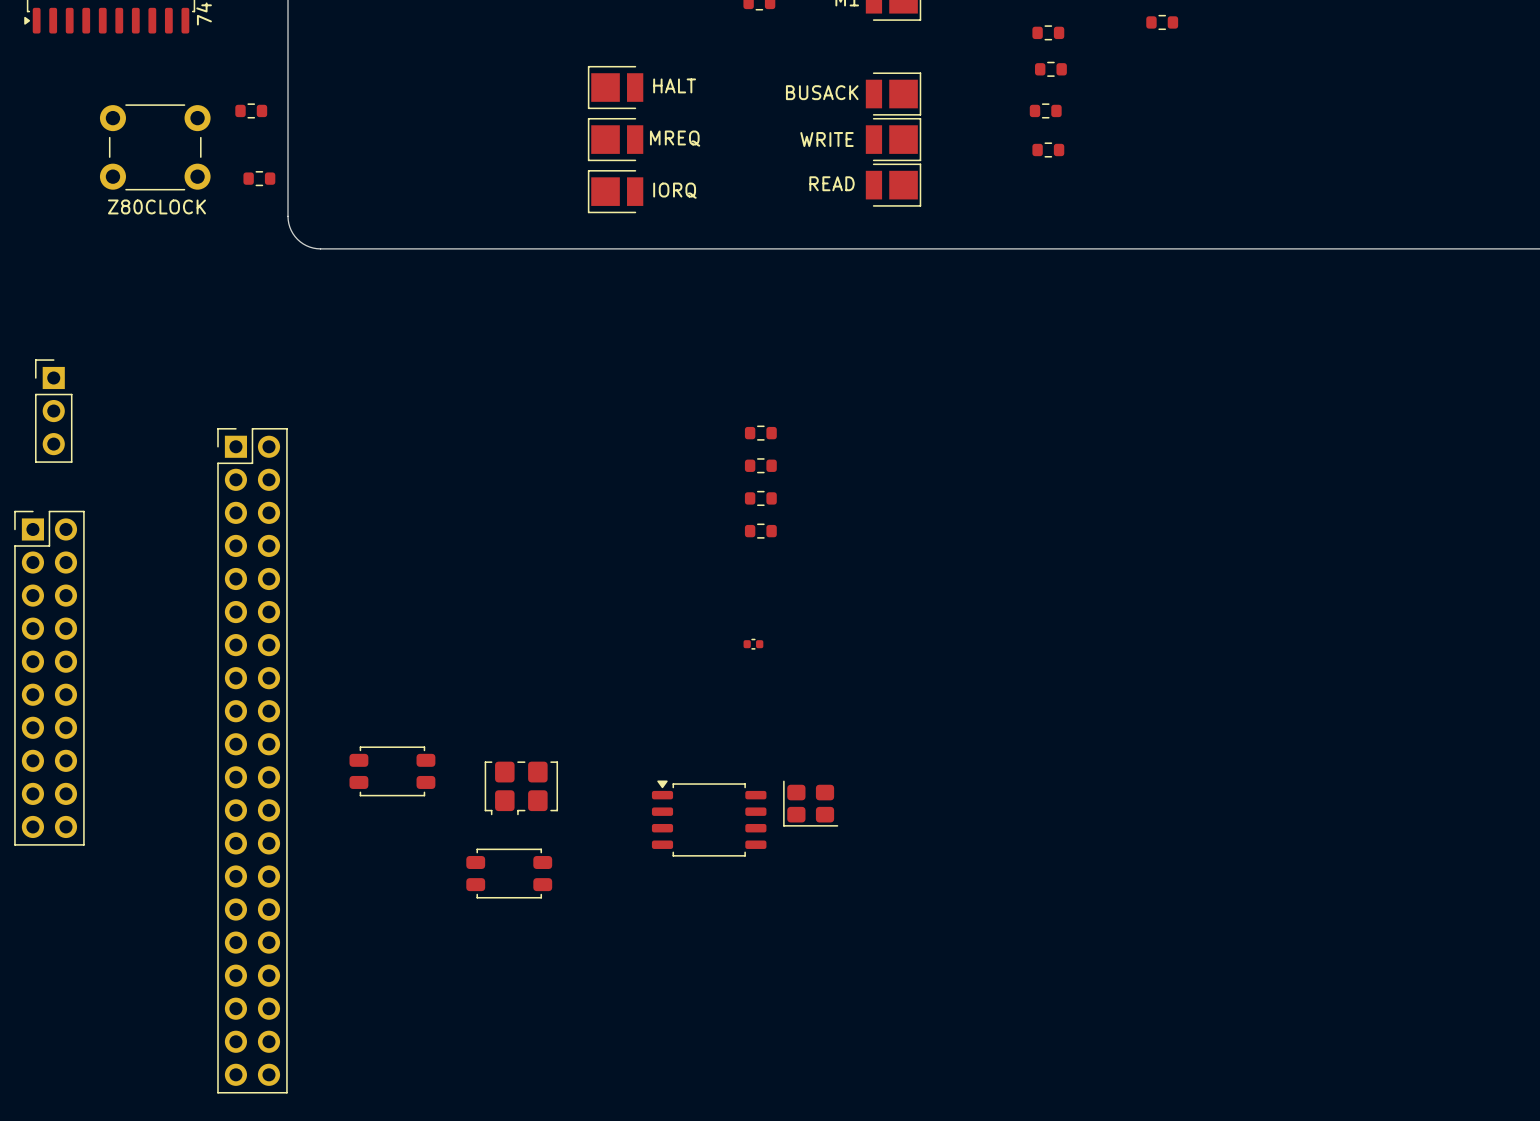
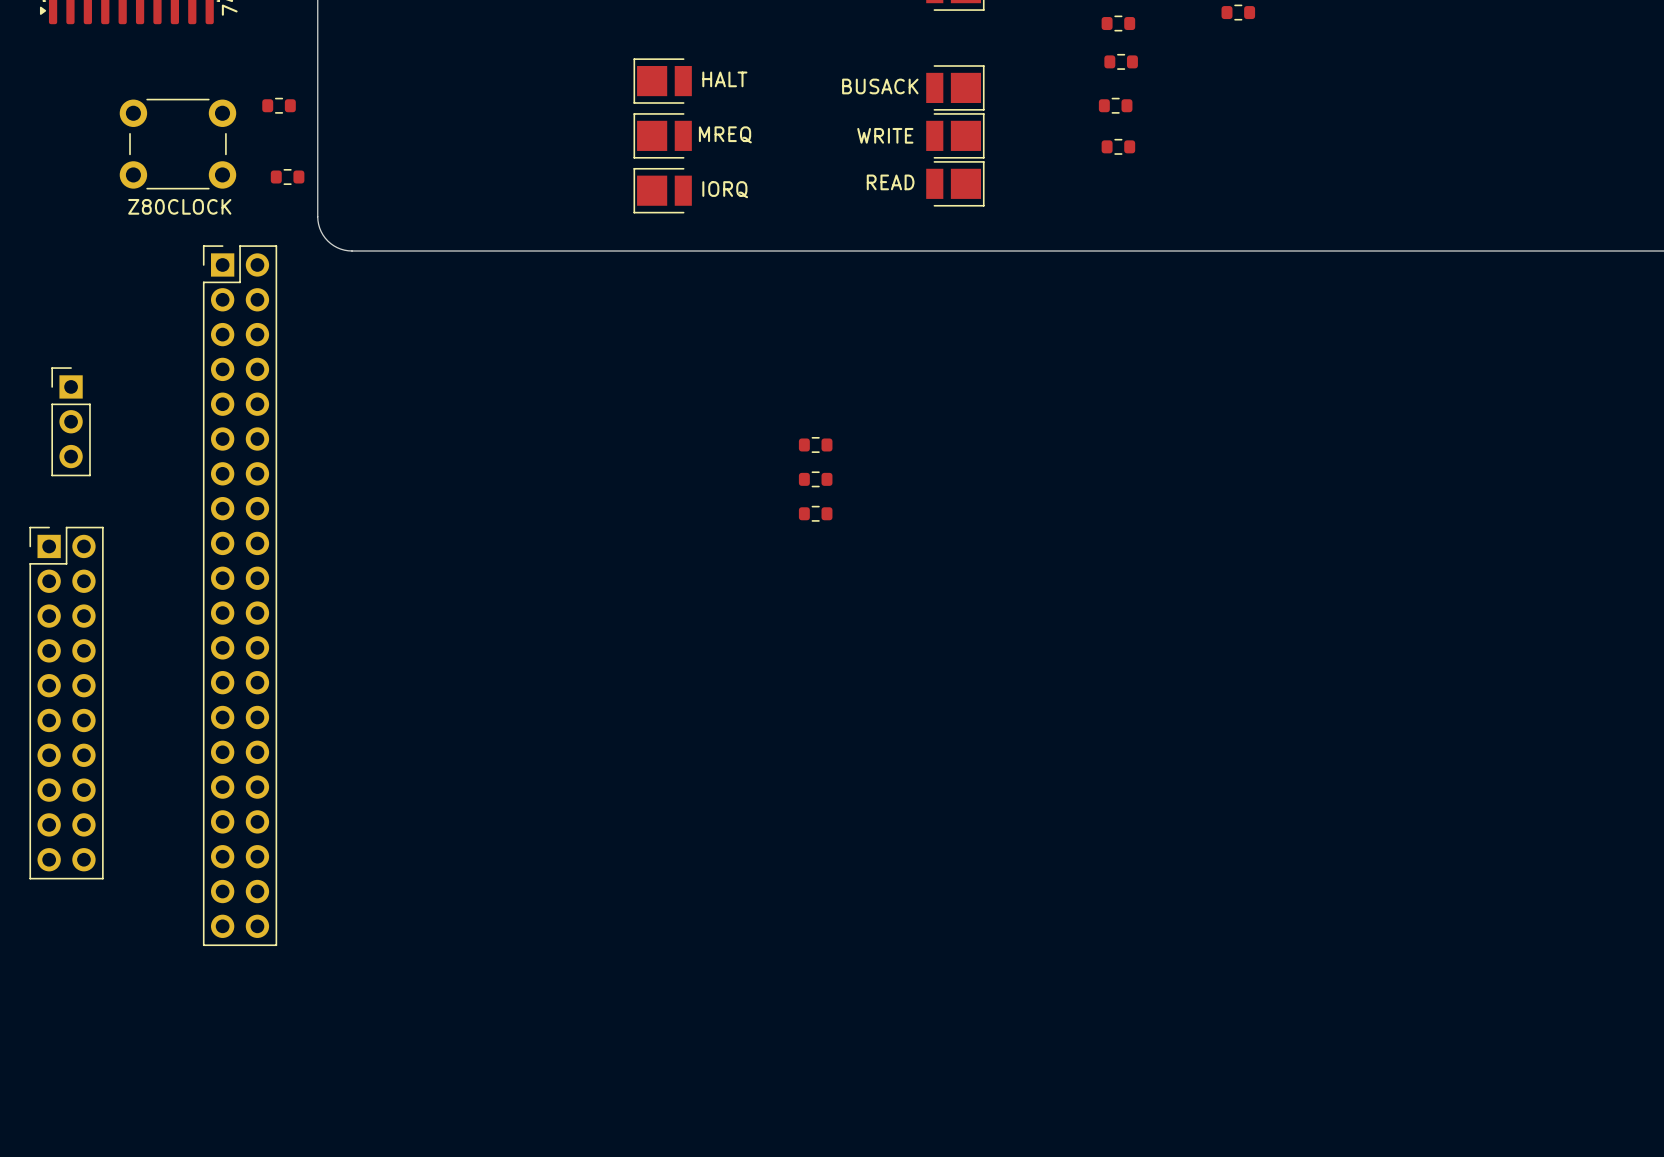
part: (760, 531) -> none
part: (753, 644) -> none
part position: (252, 760) -> (240, 595)
part: (392, 771) -> none
part: (521, 788) -> none
part: (810, 803) -> none
part: (709, 818) -> none
part: (509, 873) -> none

